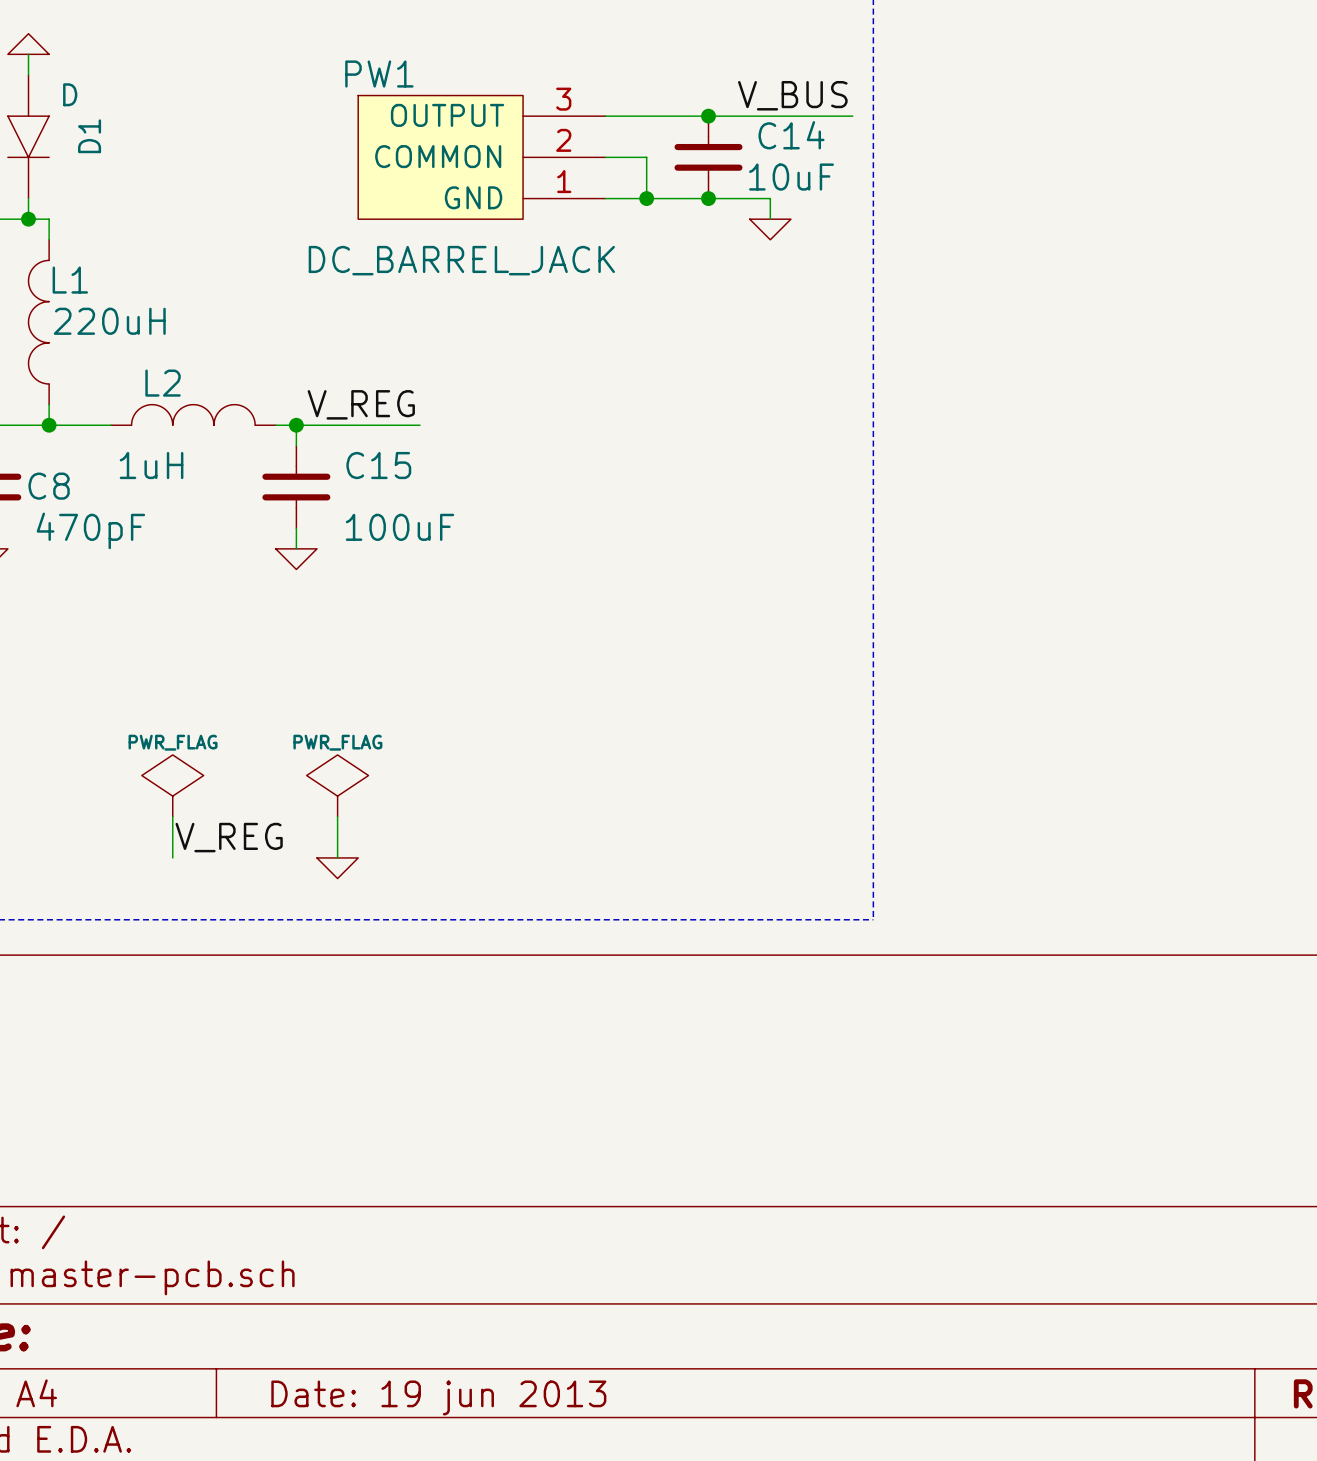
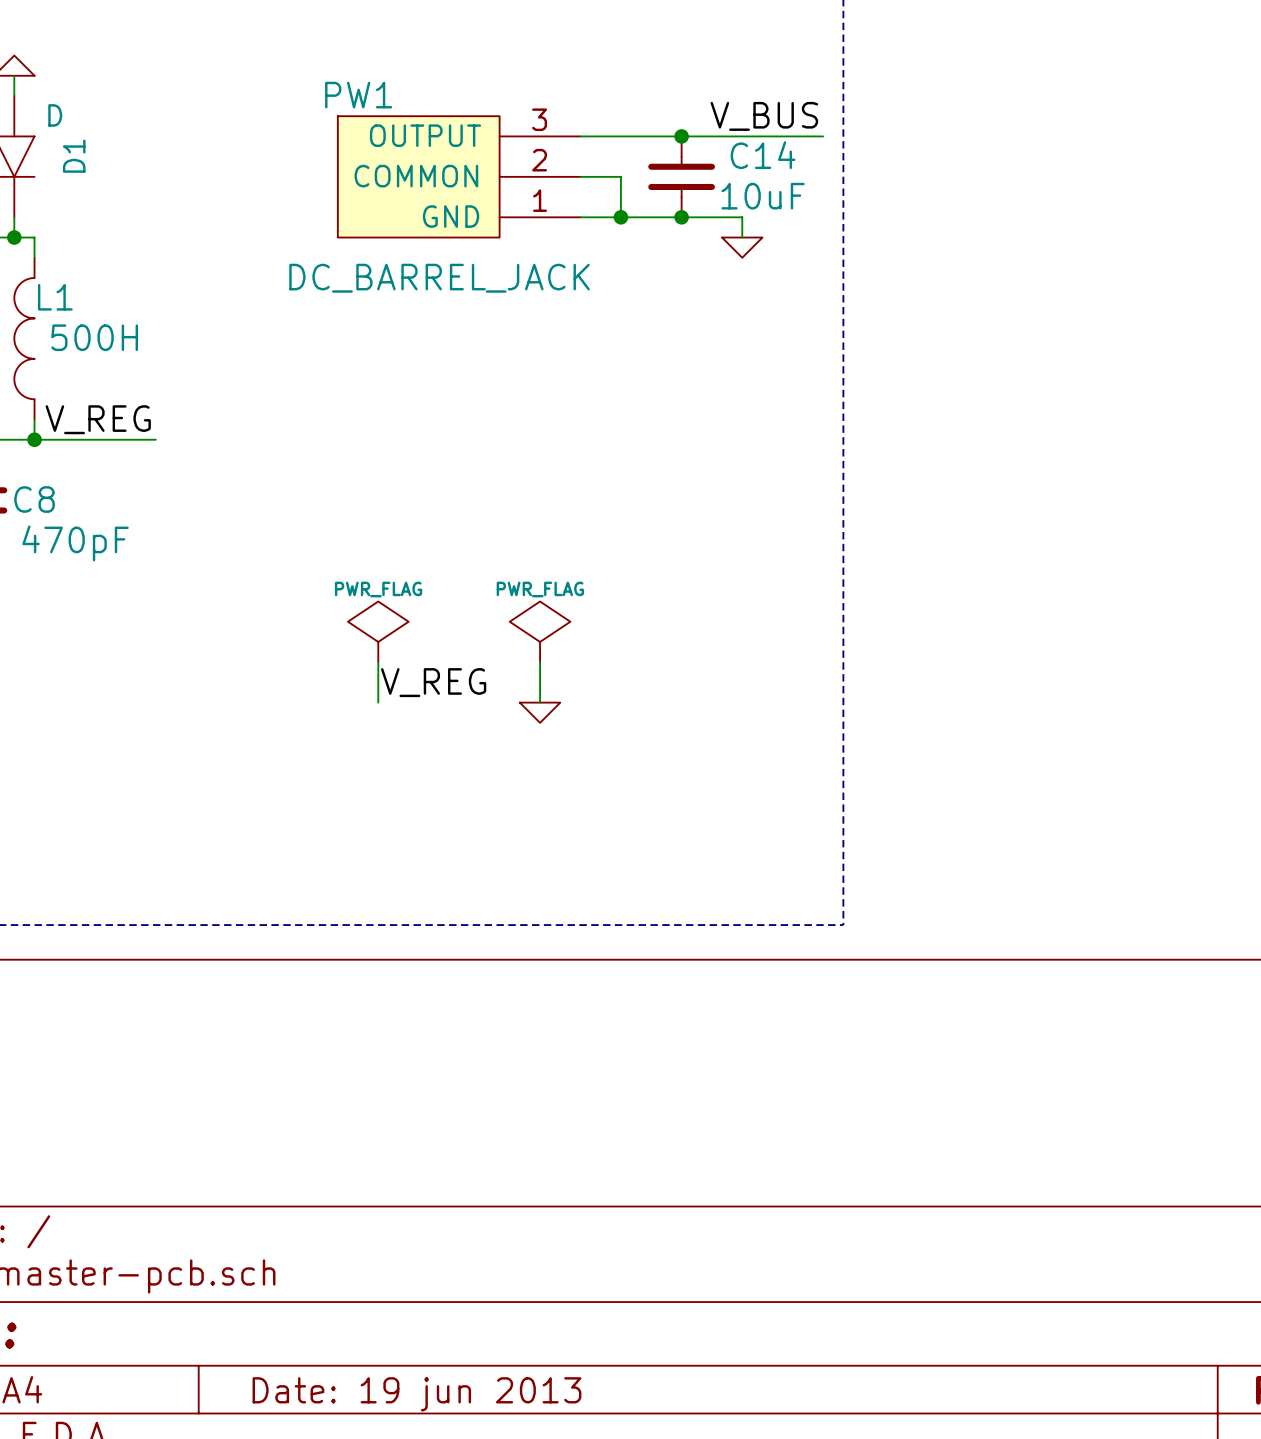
L1 value: 220uH (109, 321) -> 500H (94, 337)
label: none -> V_REG (98, 419)
label: V_REG (361, 404) -> none
L2: 1uH (193, 414) -> none
wire: none -> (95, 439) (155, 439)
wire: (275, 425) (420, 425) -> none
wire: (296, 425) (296, 445) -> none
junction: (296, 425) -> none
C15: 100uF (296, 487) -> none
wire: (296, 528) (296, 548) -> none
power symbol: (296, 559) -> none
power symbol: none -> PWR_FLAG (378, 631)
power symbol: none -> PWR_FLAG (540, 631)
label: none -> V_REG (433, 682)
power symbol: none -> (540, 712)
power symbol: PWR_FLAG (172, 785) -> none
power symbol: PWR_FLAG (337, 785) -> none
wire: (172, 816) (172, 857) -> (378, 662) (378, 702)
wire: (337, 816) (337, 857) -> (540, 662) (540, 702)
label: V_REG (229, 837) -> none
power symbol: (337, 868) -> none

